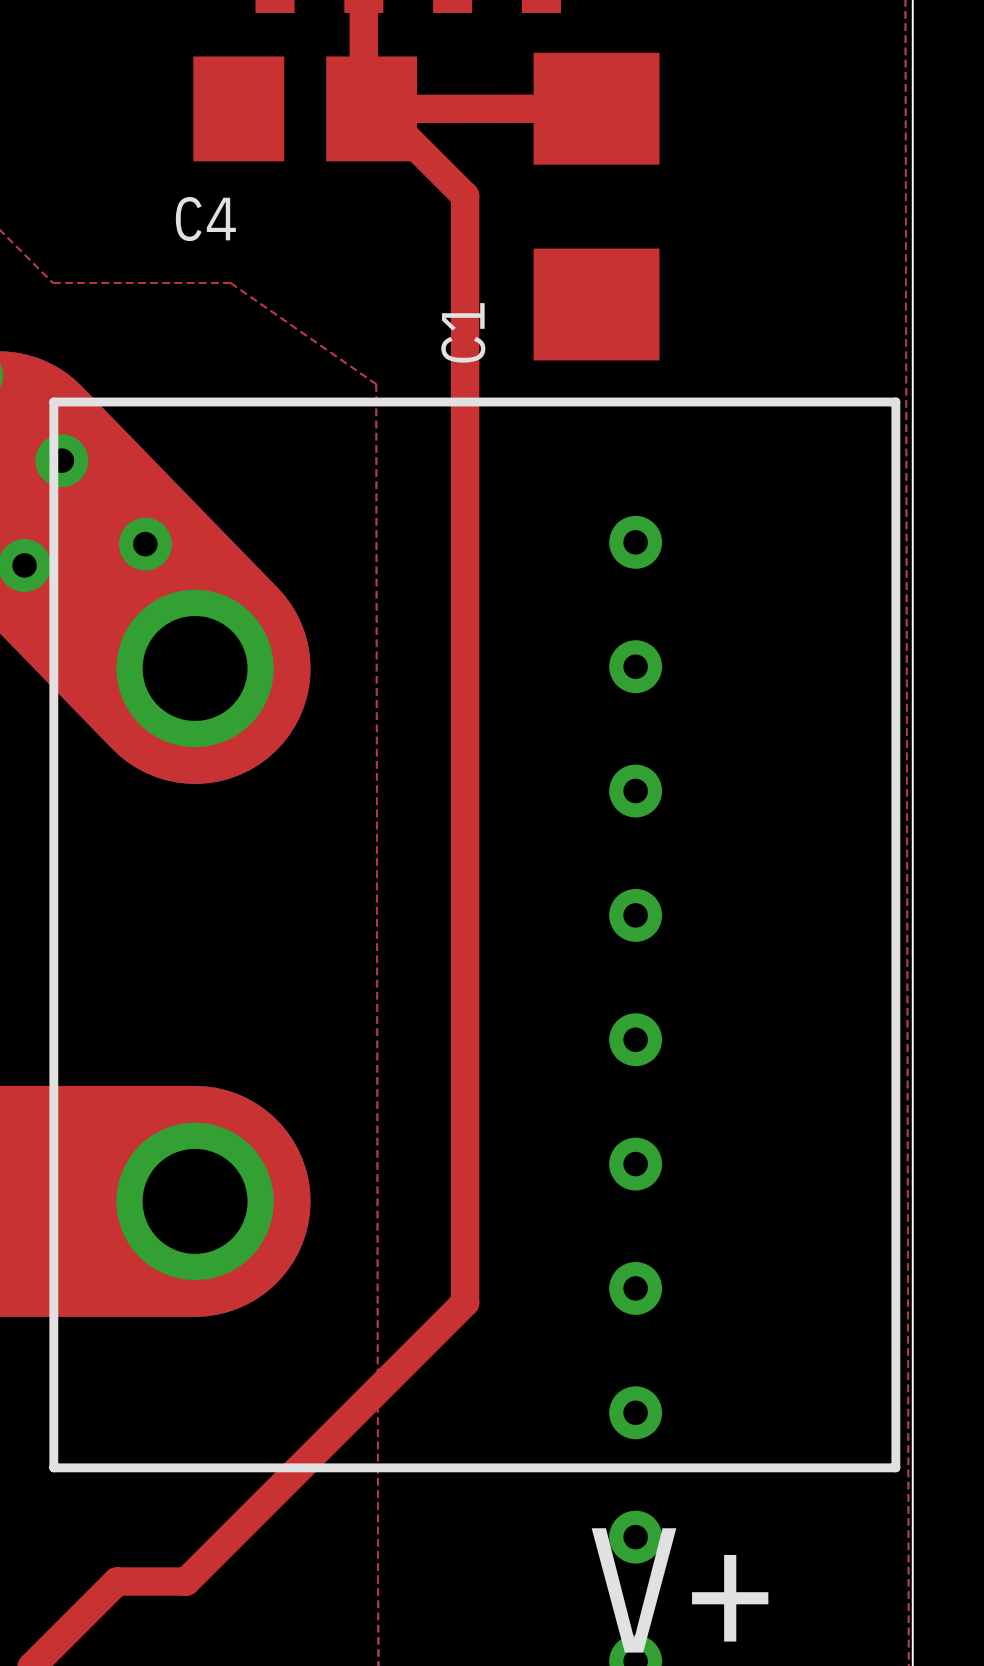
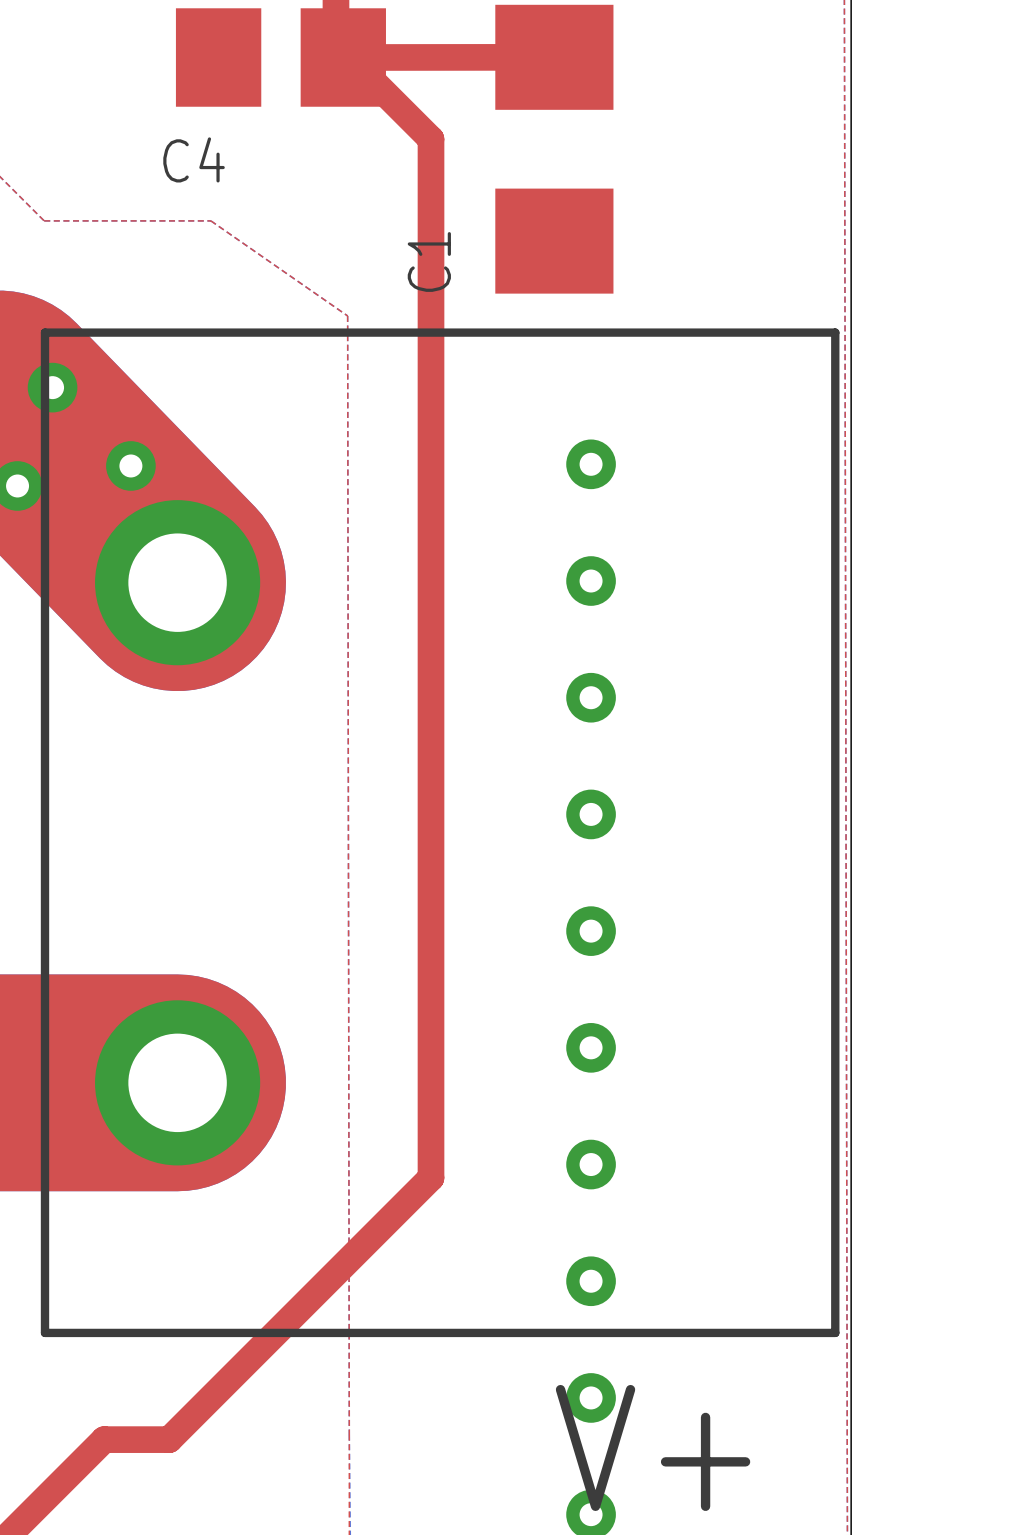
part footprint: [49, 397, 901, 1473] -> [40, 328, 840, 1338]

